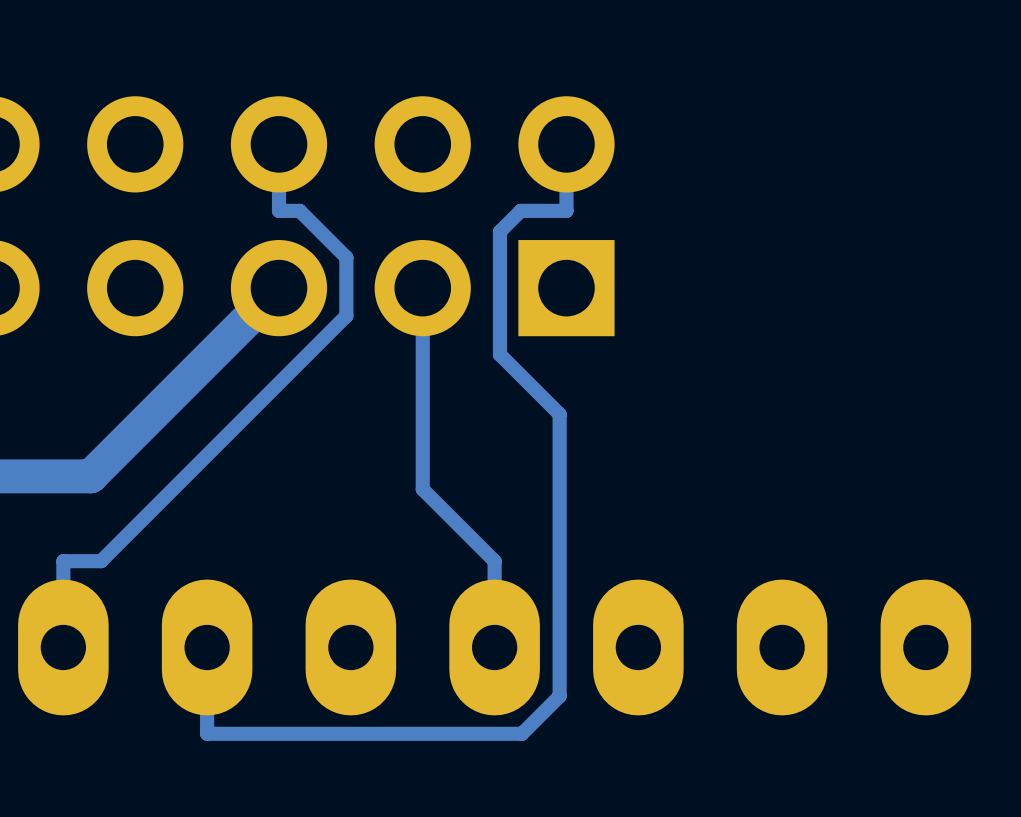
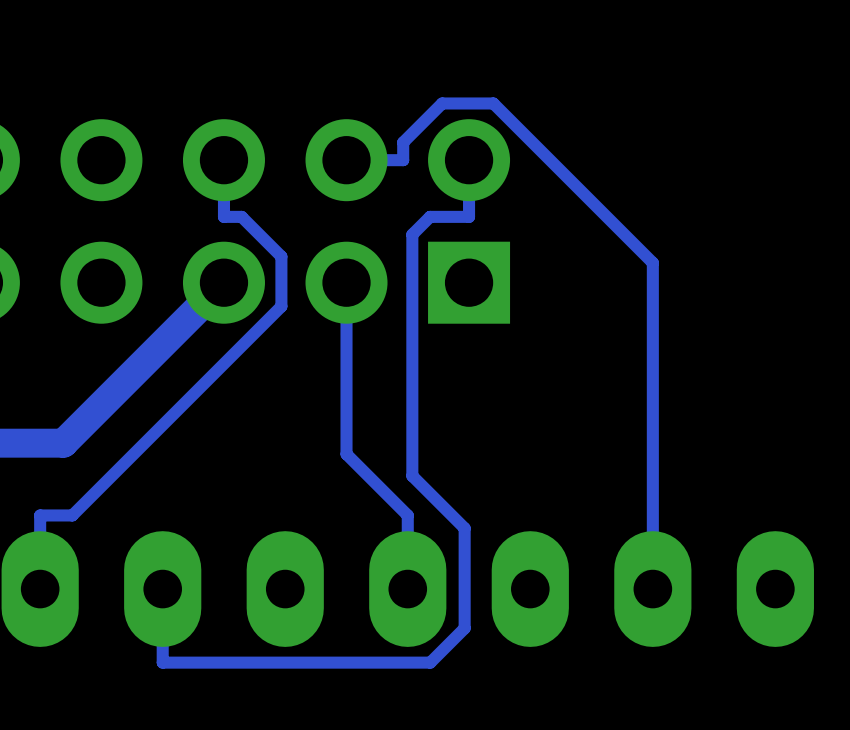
track: none -> (346, 160) (403, 160) (403, 142) (442, 103) (493, 103) (652, 262) (652, 589)
track: (499, 354) (559, 414) (559, 696) (522, 733) -> (412, 339) (412, 475) (464, 528) (464, 628) (430, 662)

